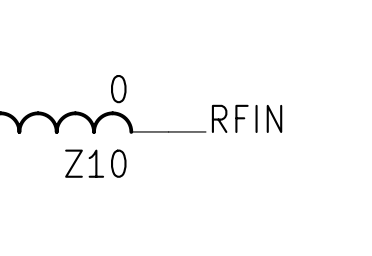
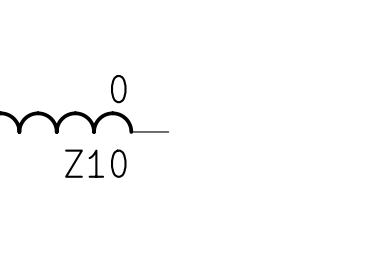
label: RFIN (247, 118) -> none
wire: (168, 131) (205, 131) -> none

